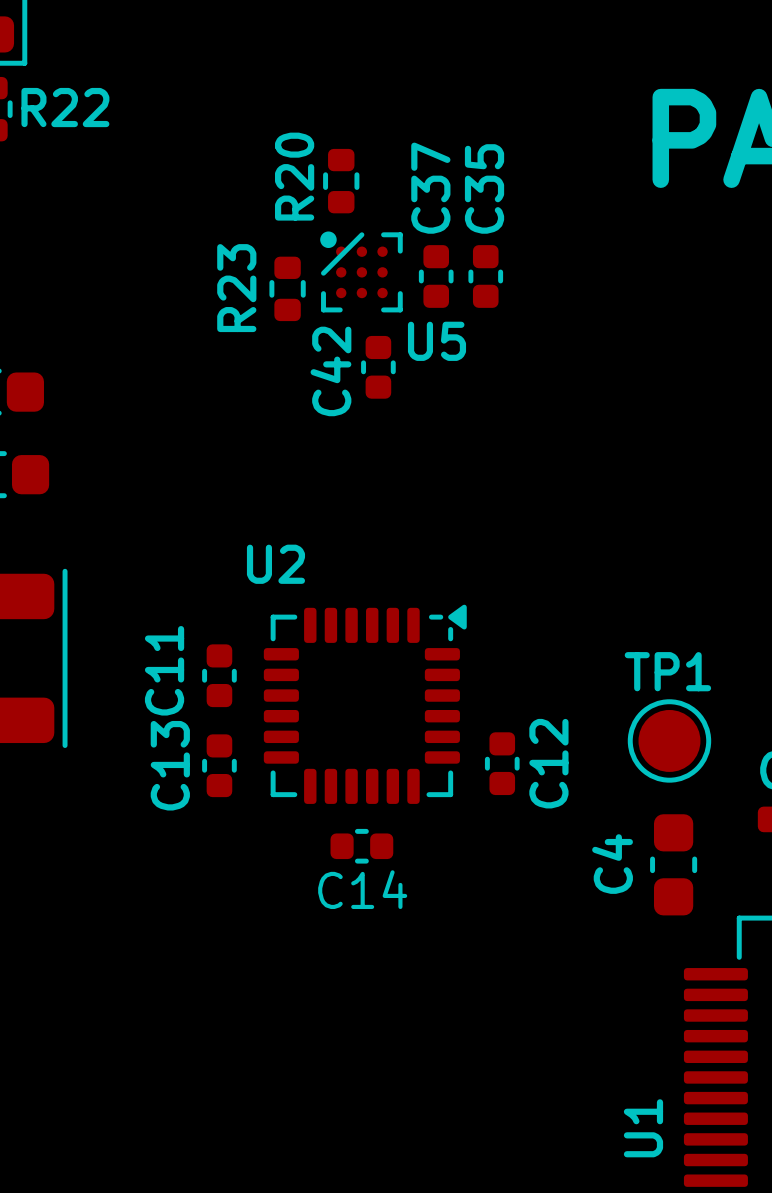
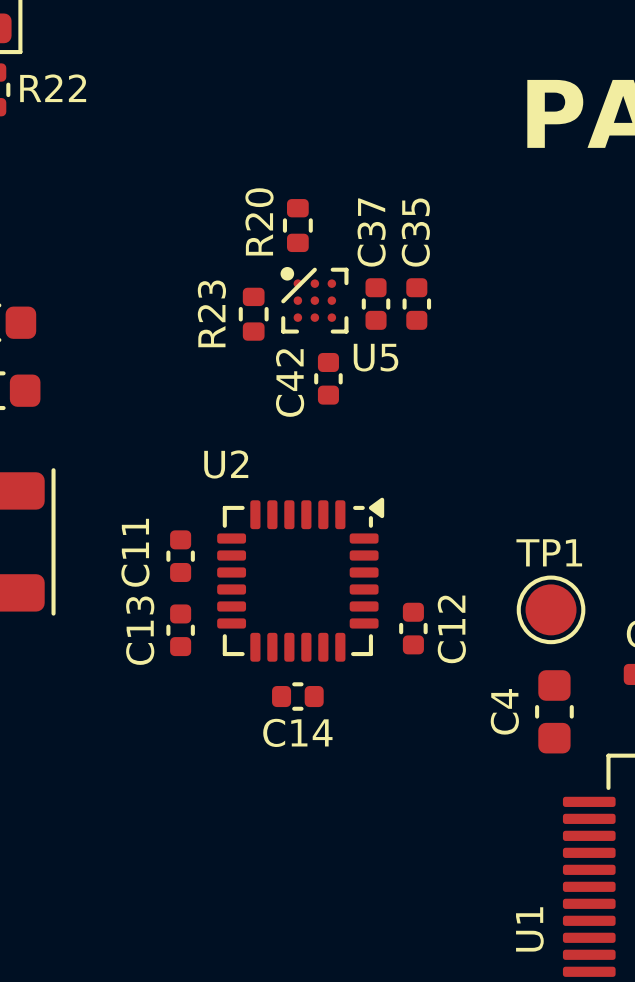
R20 position: (341, 181) -> (297, 225)
U5 position: (361, 271) -> (314, 300)
C37 position: (436, 276) -> (376, 304)
C35 position: (485, 276) -> (416, 304)
R23 position: (287, 288) -> (253, 314)
C42 position: (378, 367) -> (328, 378)

